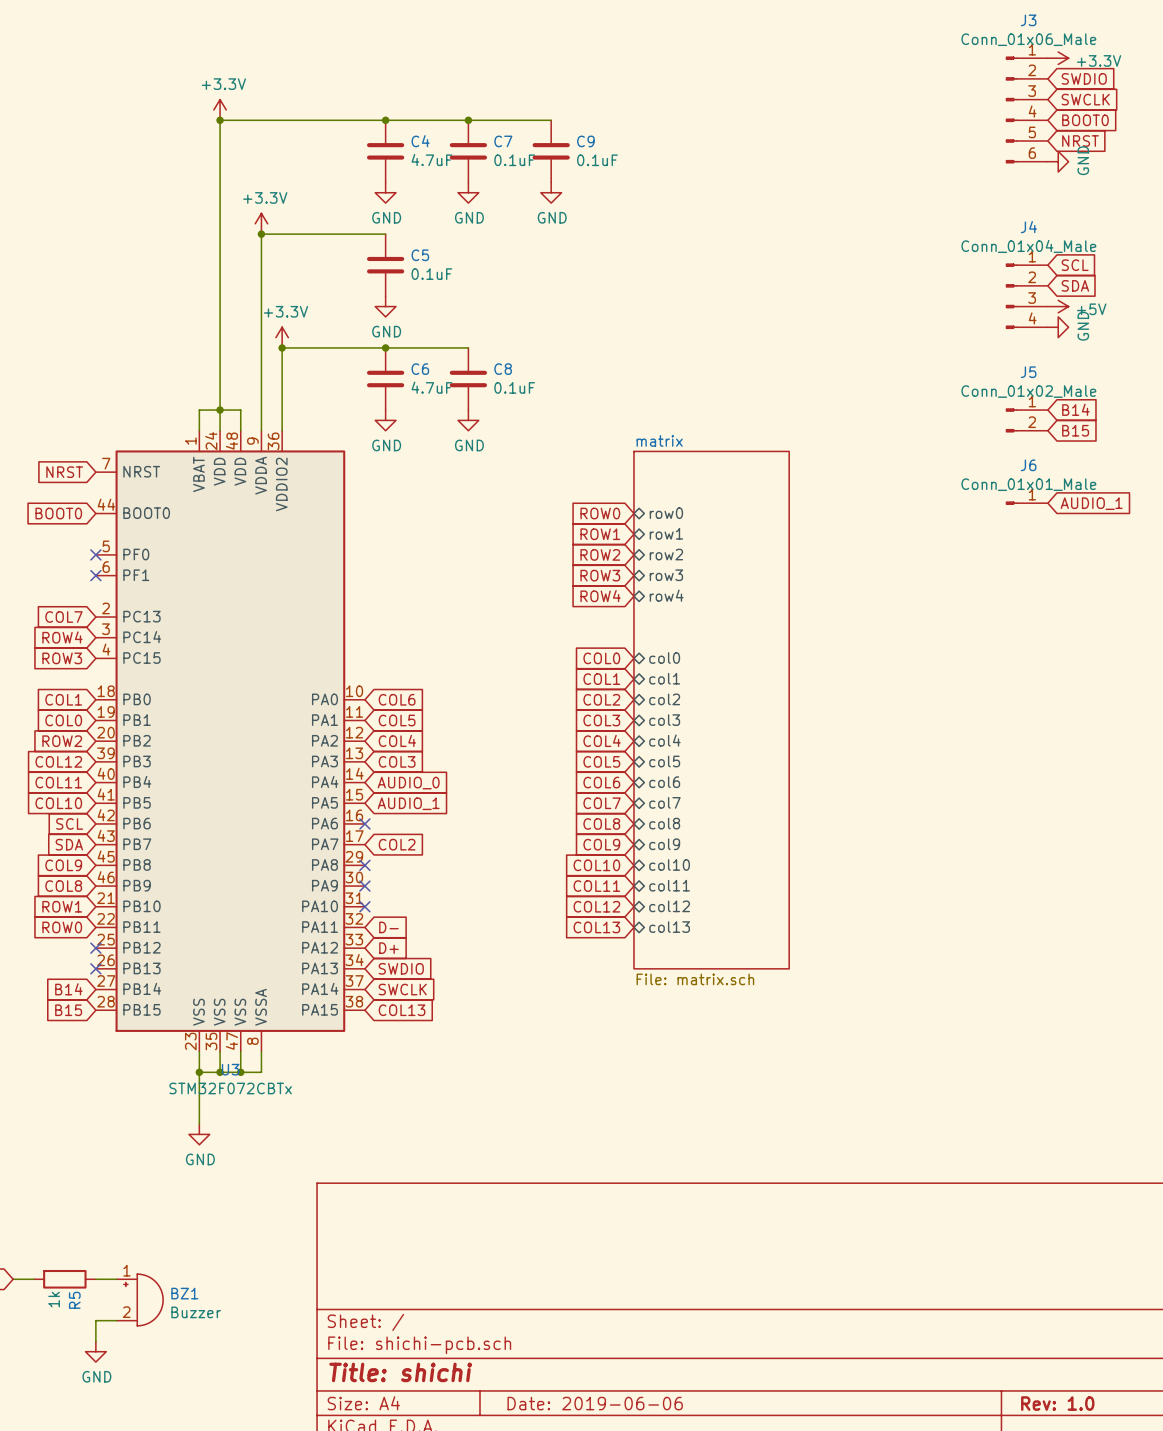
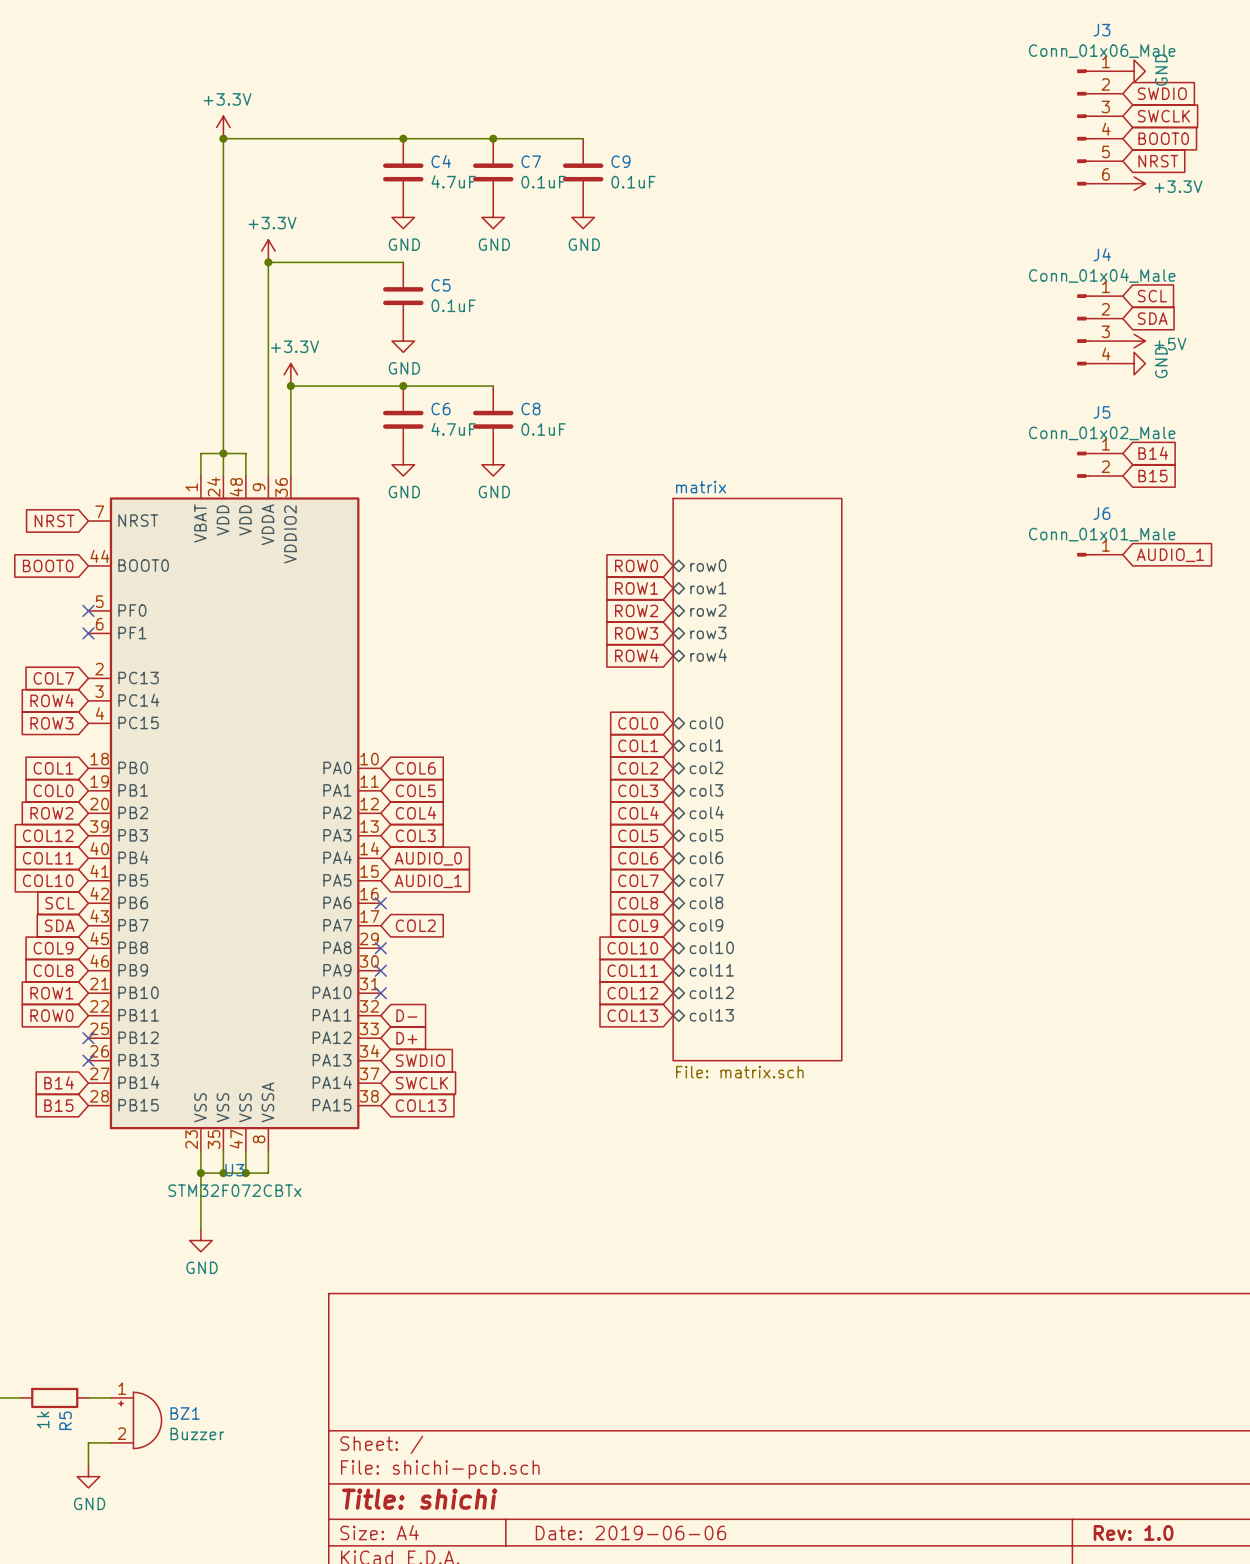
power symbol: +3.3V (1058, 58) -> GND (1134, 71)
power symbol: GND (1058, 161) -> +3.3V (1134, 183)

